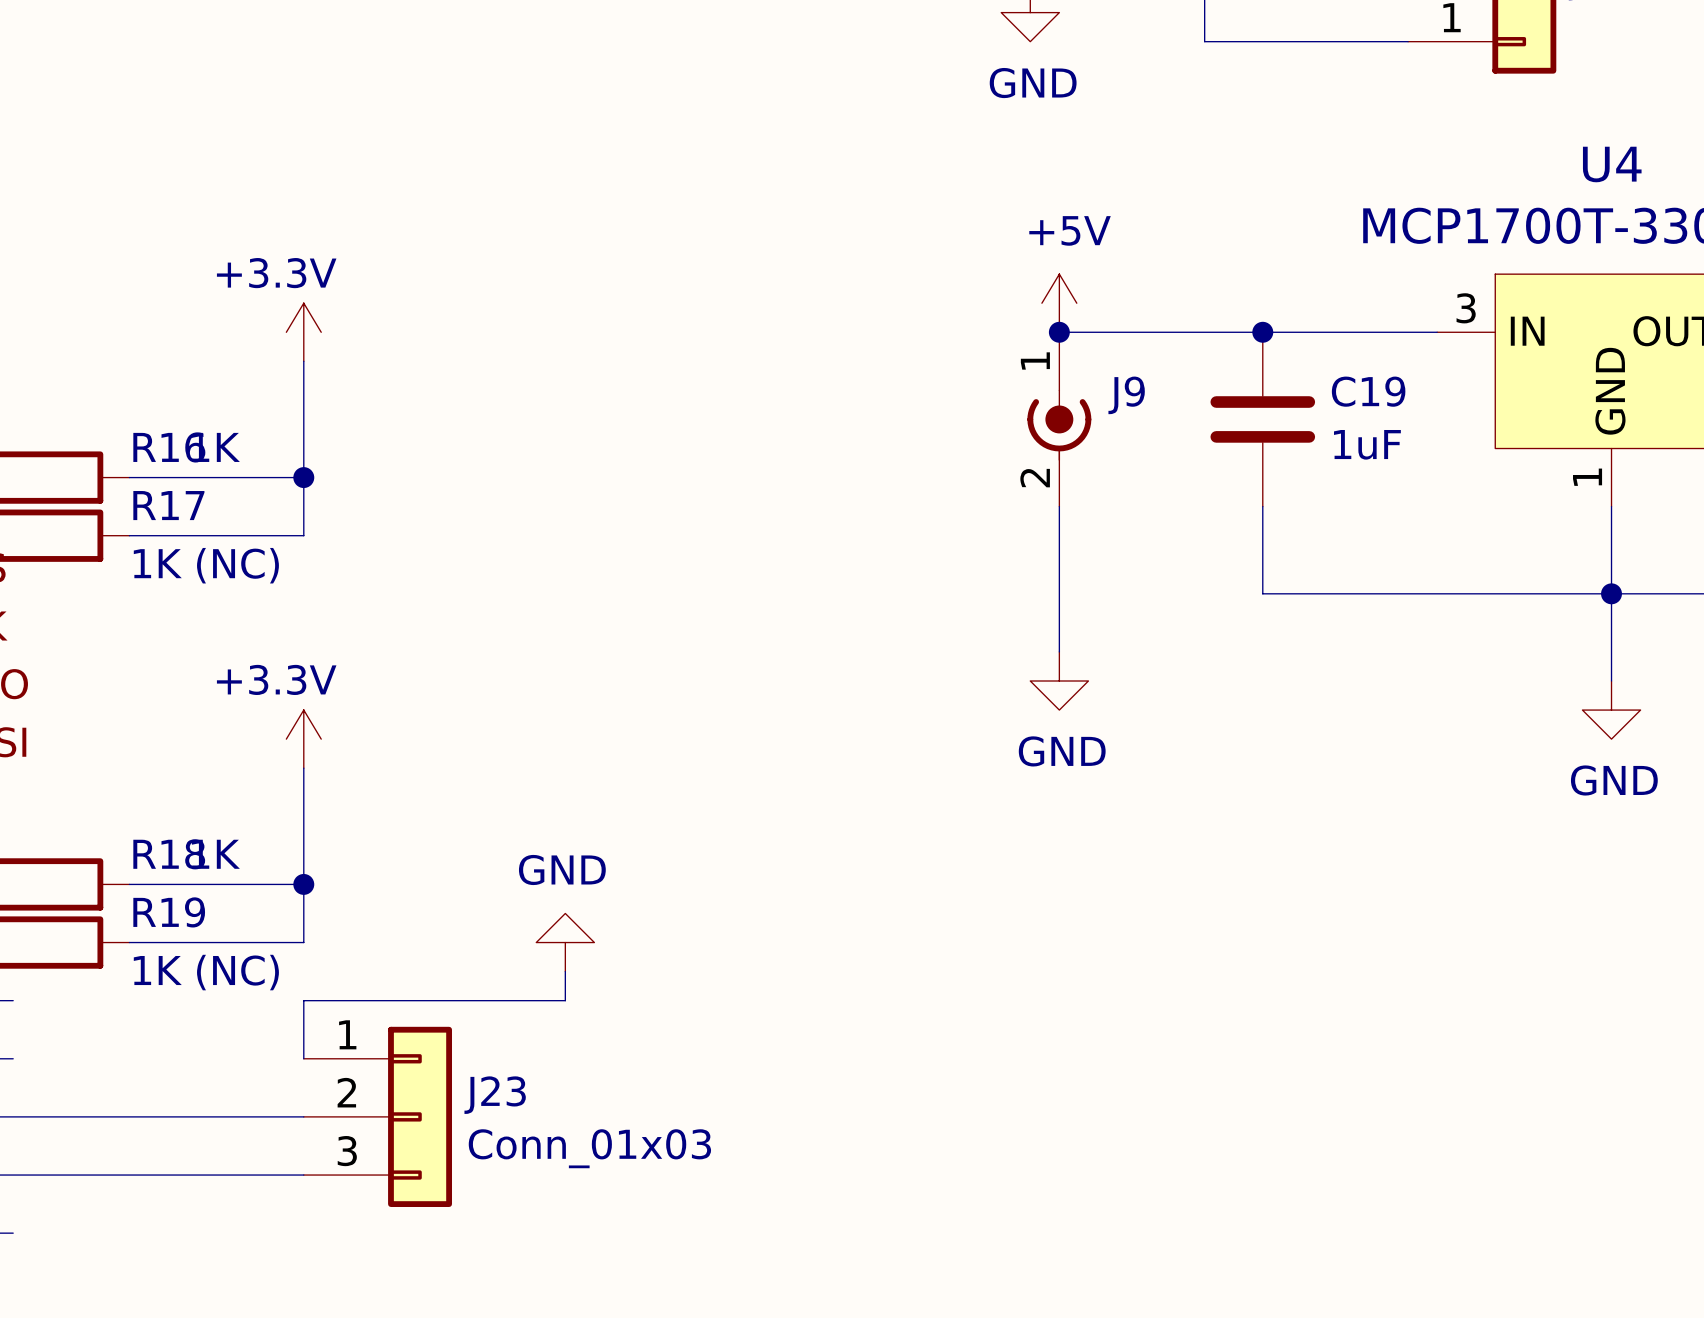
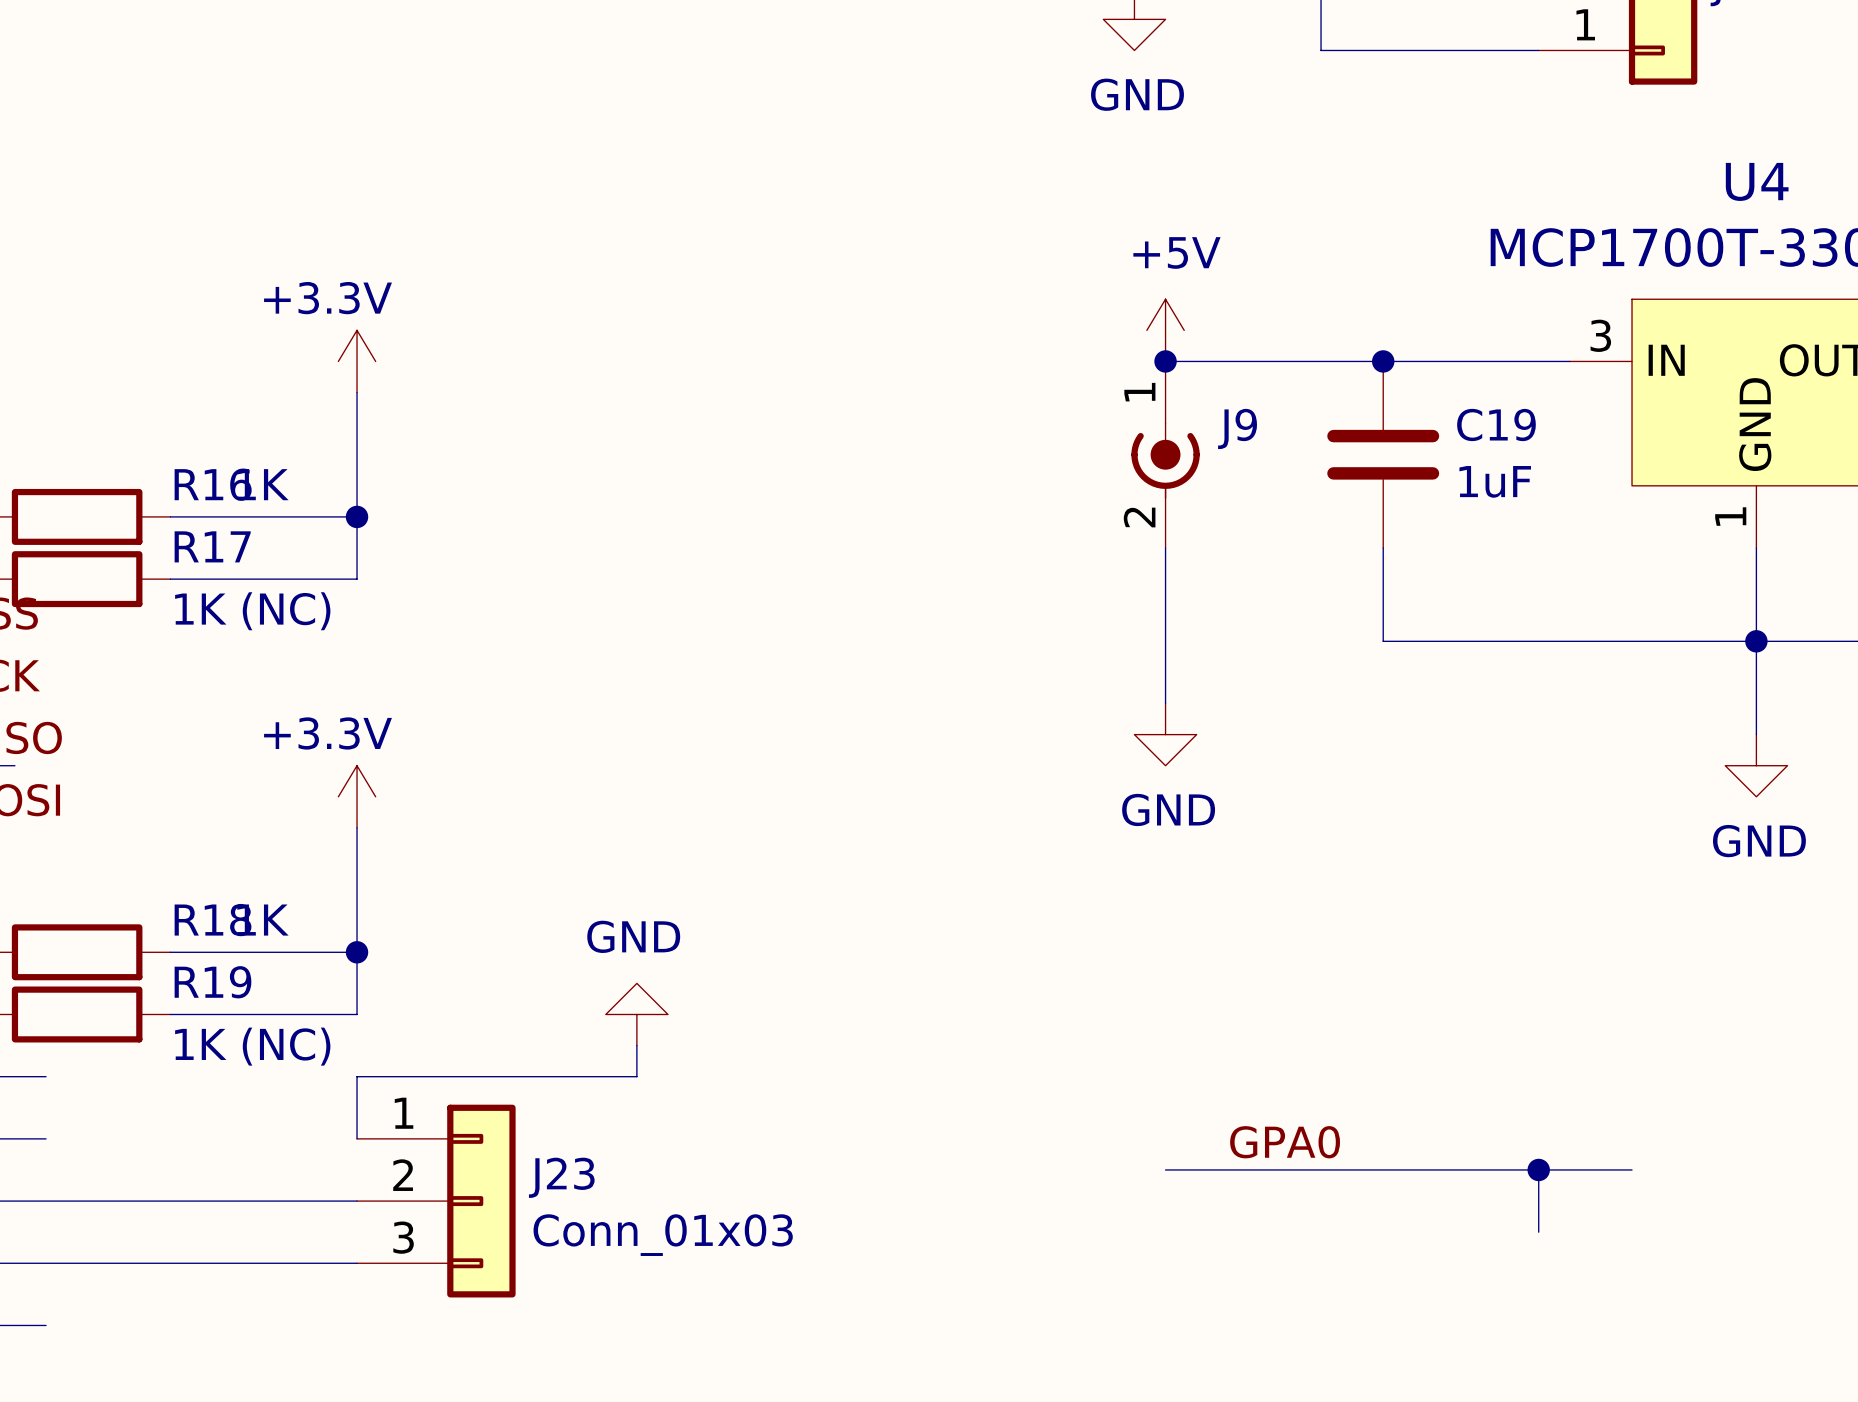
label: none -> GPA0 (1285, 1142)
wire: none -> (1165, 1169) (1632, 1169)
wire: none -> (1538, 1169) (1538, 1232)
junction: none -> (1538, 1169)

